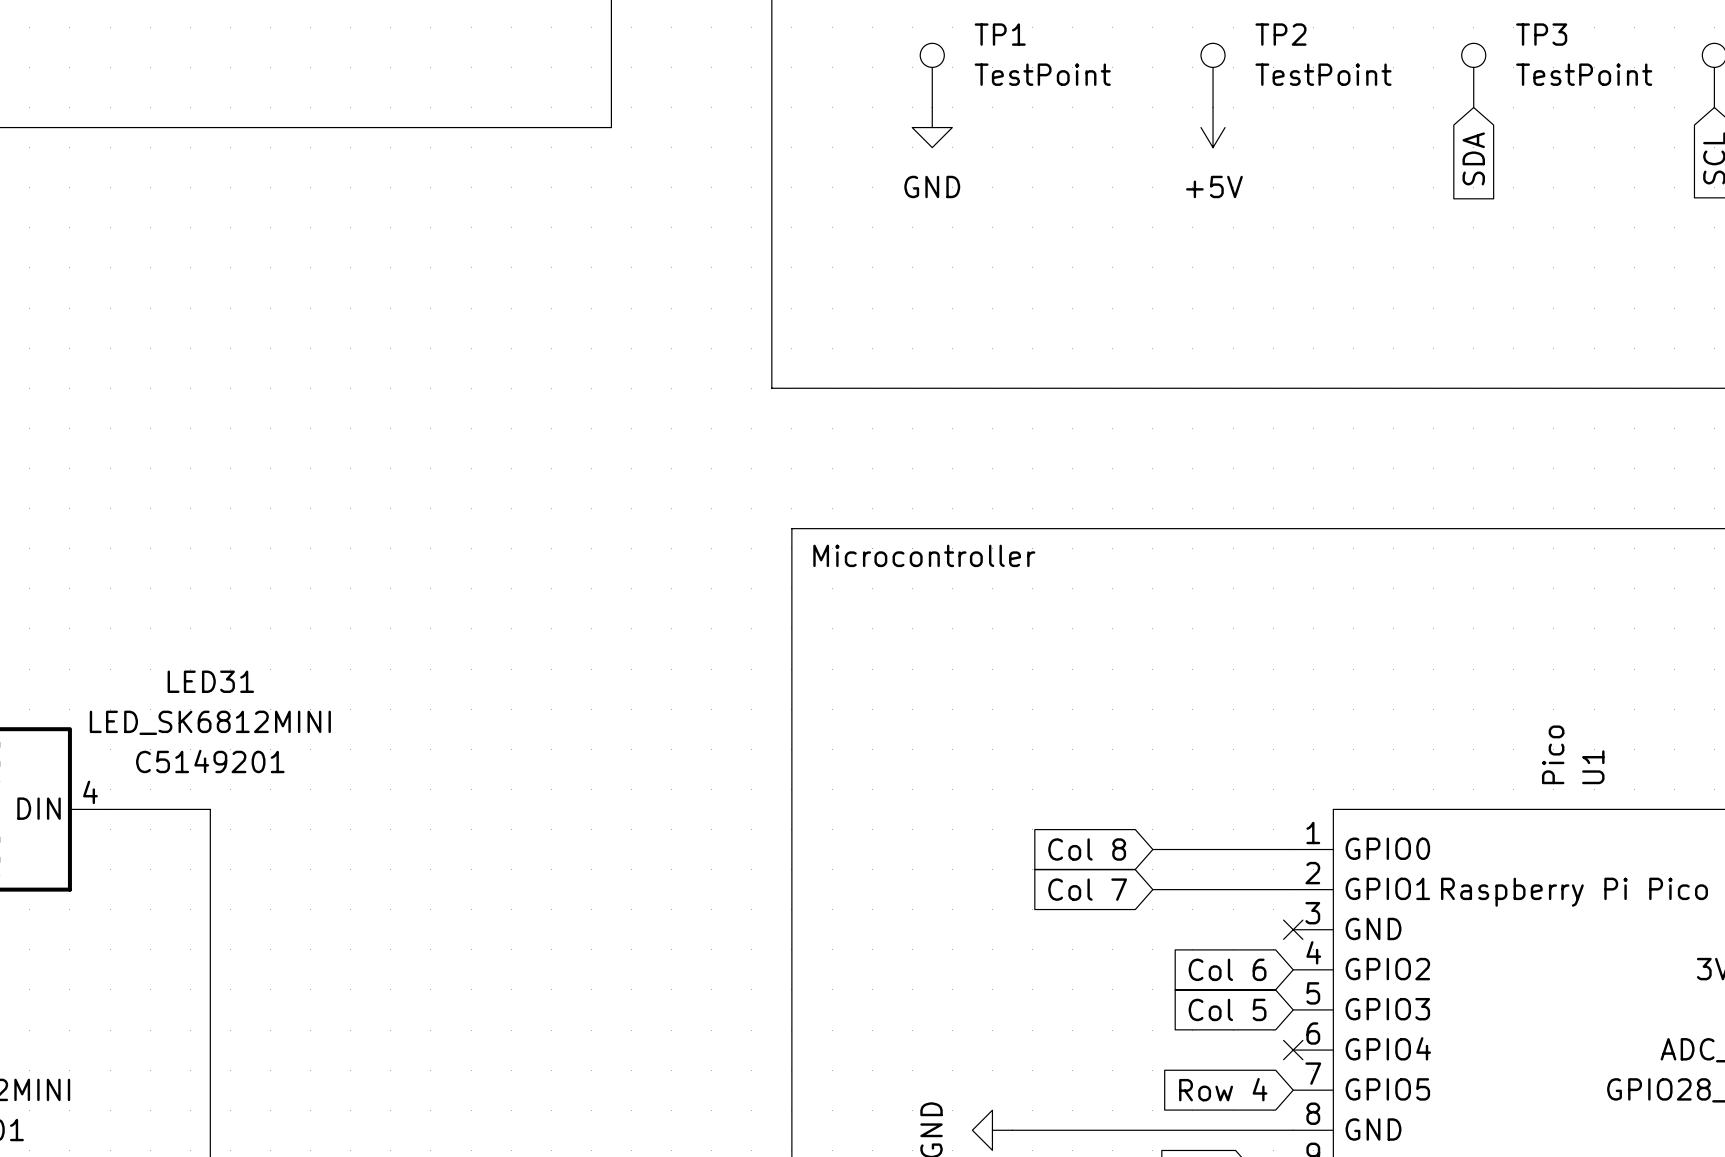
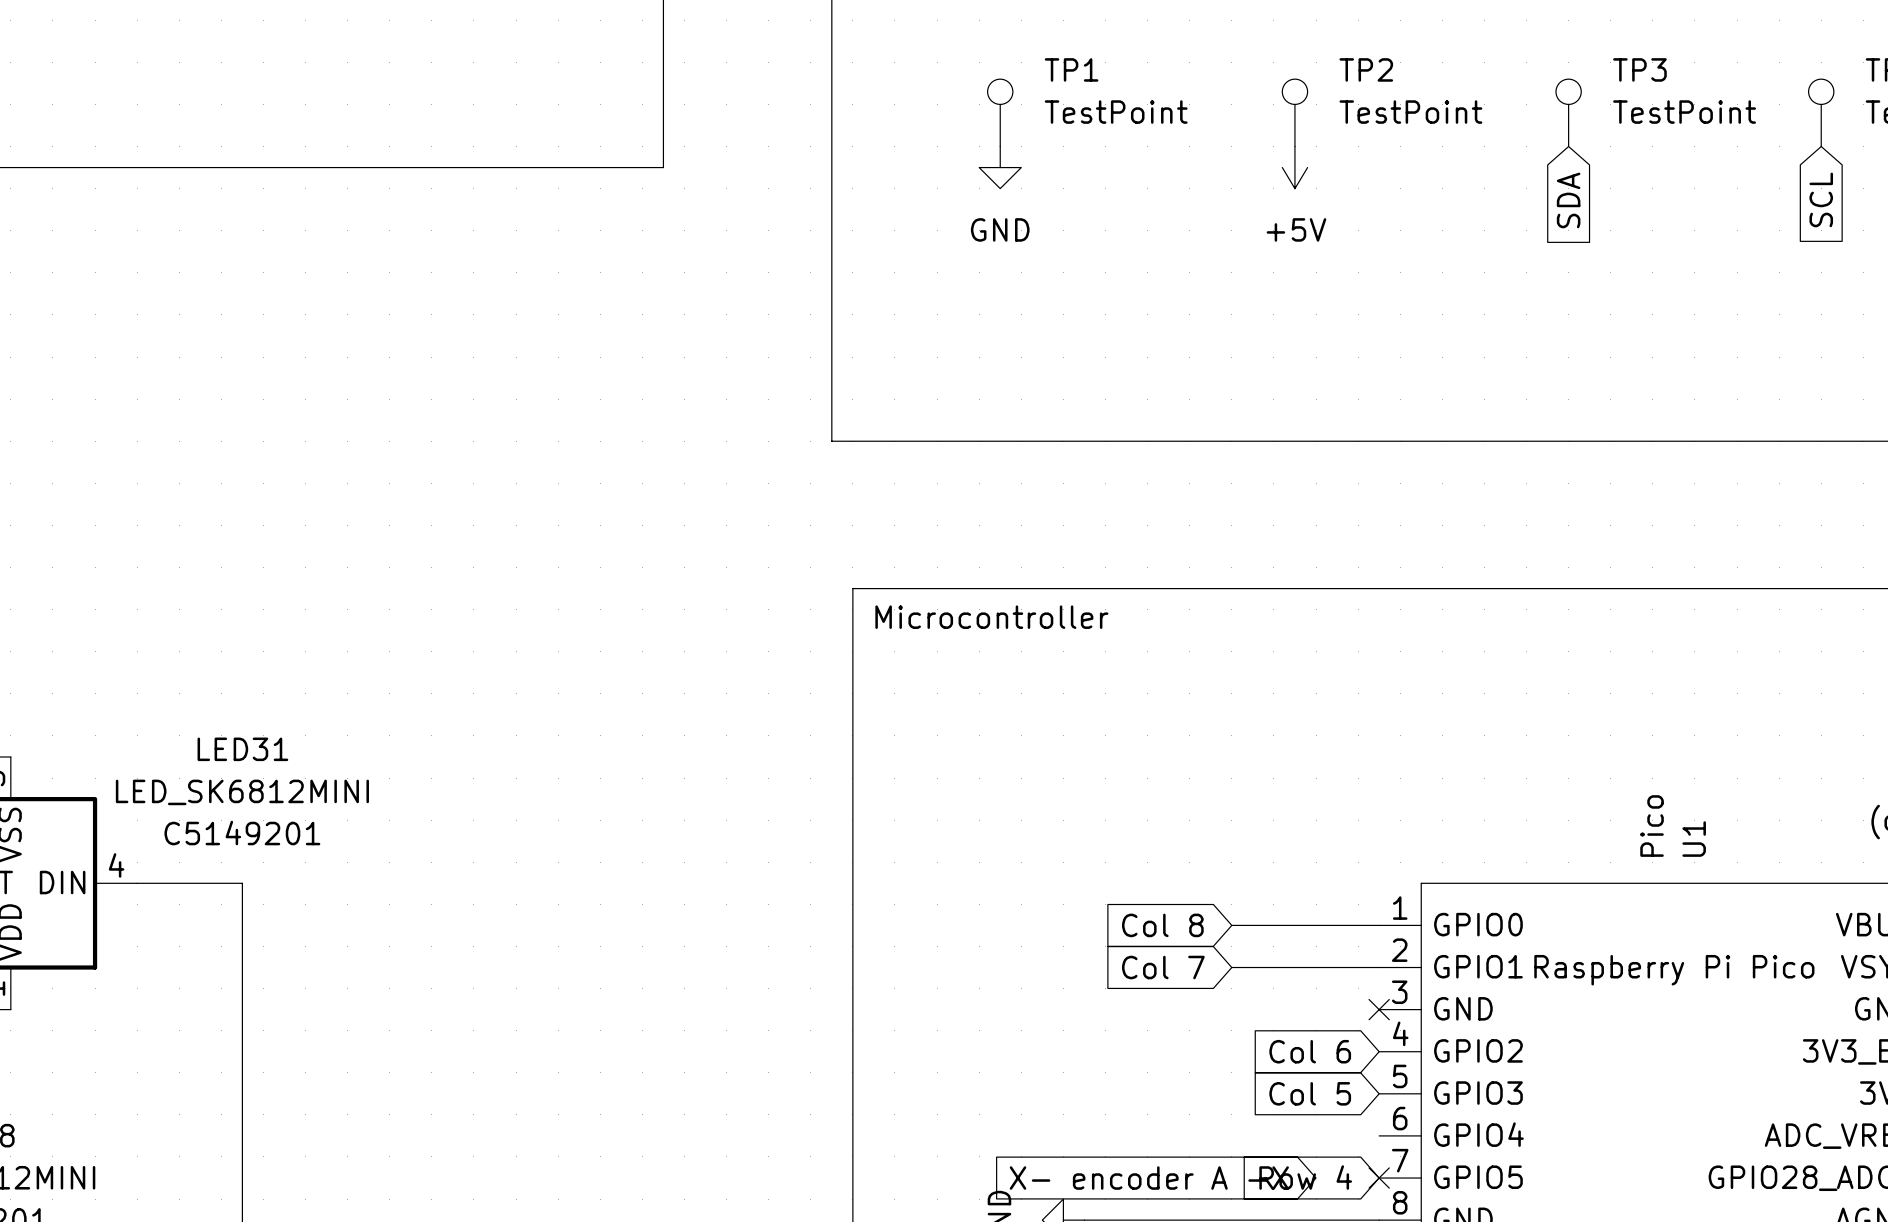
no-connect mark position: (1293, 1050) -> (1379, 1178)
global label: none -> X- encoder A -X (1149, 1178)

